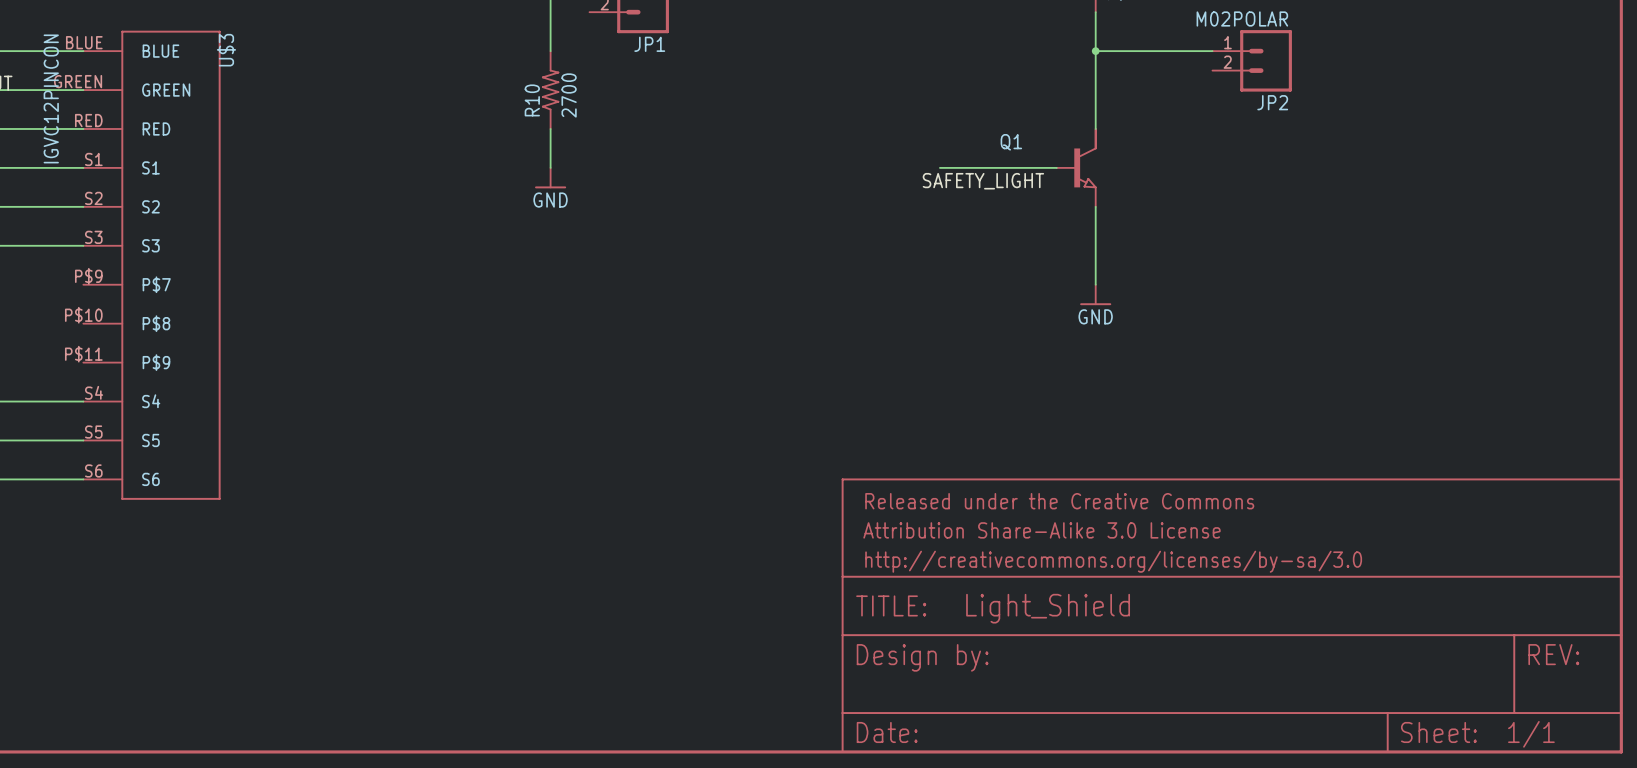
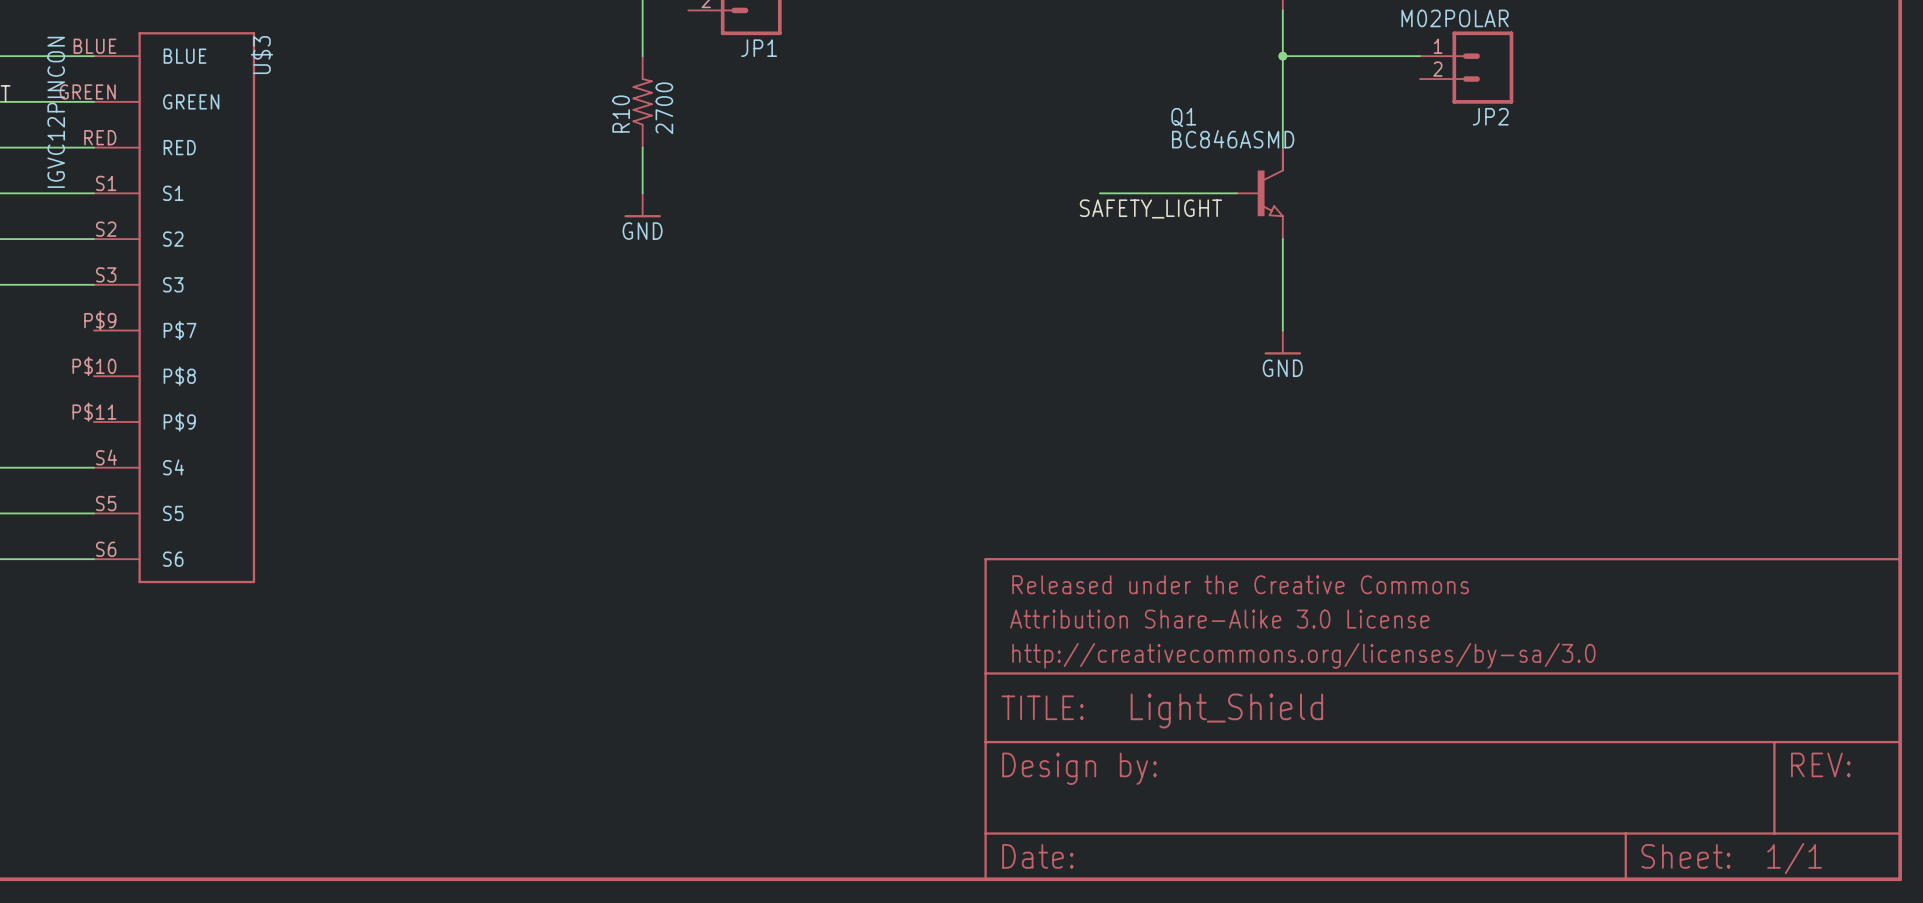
Q1 value: none -> BC846ASMD (1233, 139)
Q1 name position: Q1 (1011, 142) -> Q1 (1183, 117)

